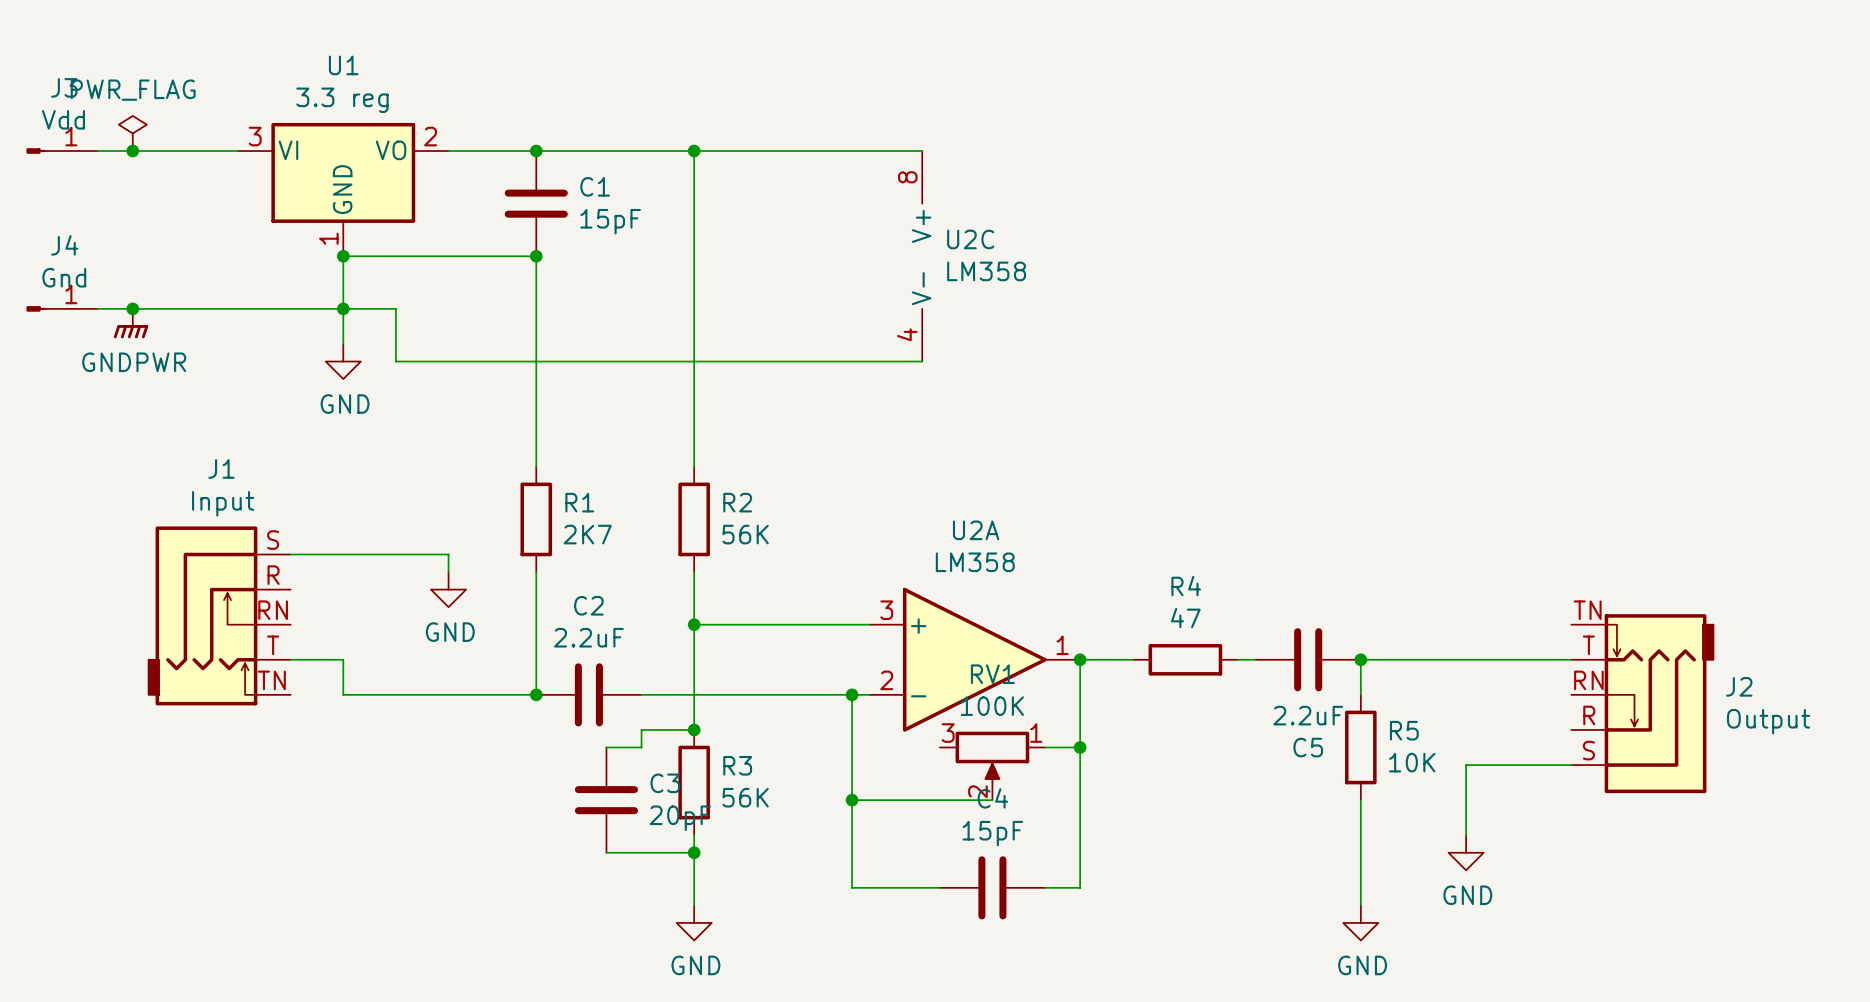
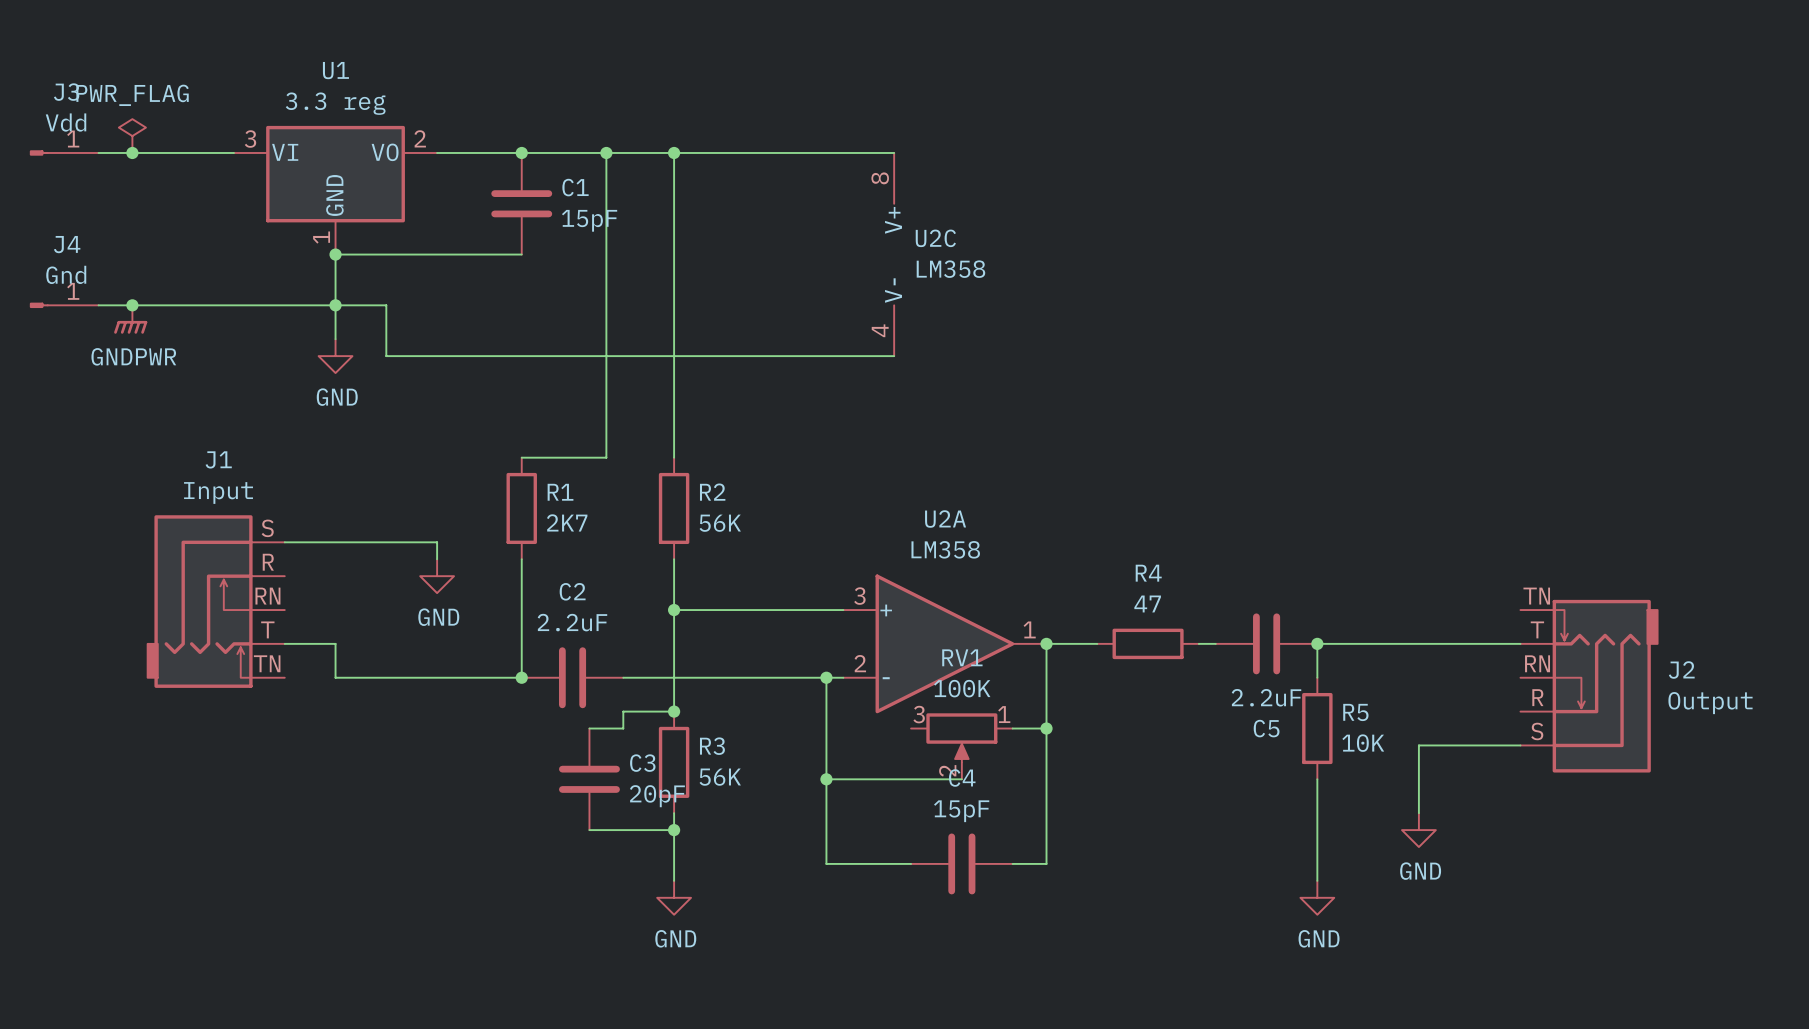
junction: none -> (606, 152)
wire: (536, 256) (536, 466) -> (606, 152) (606, 457) (521, 457)
junction: (536, 256) -> none

